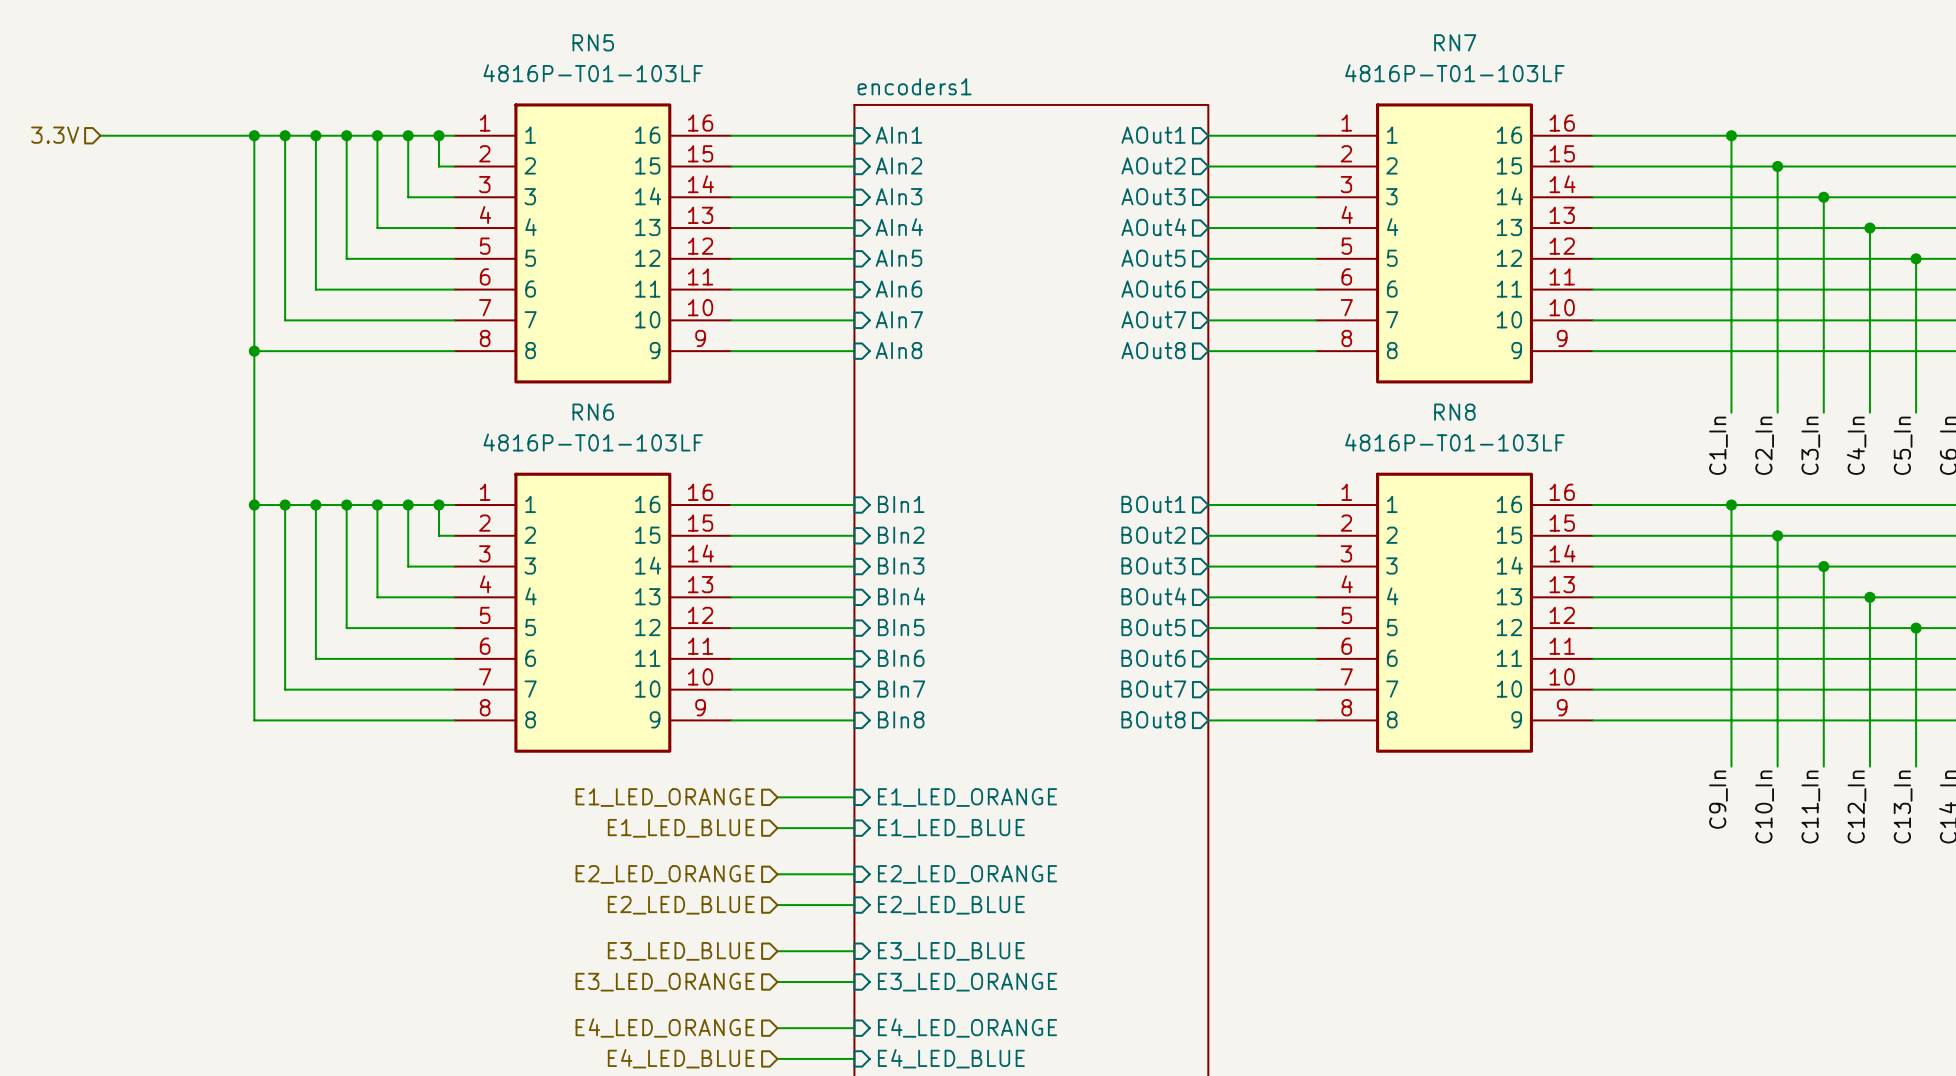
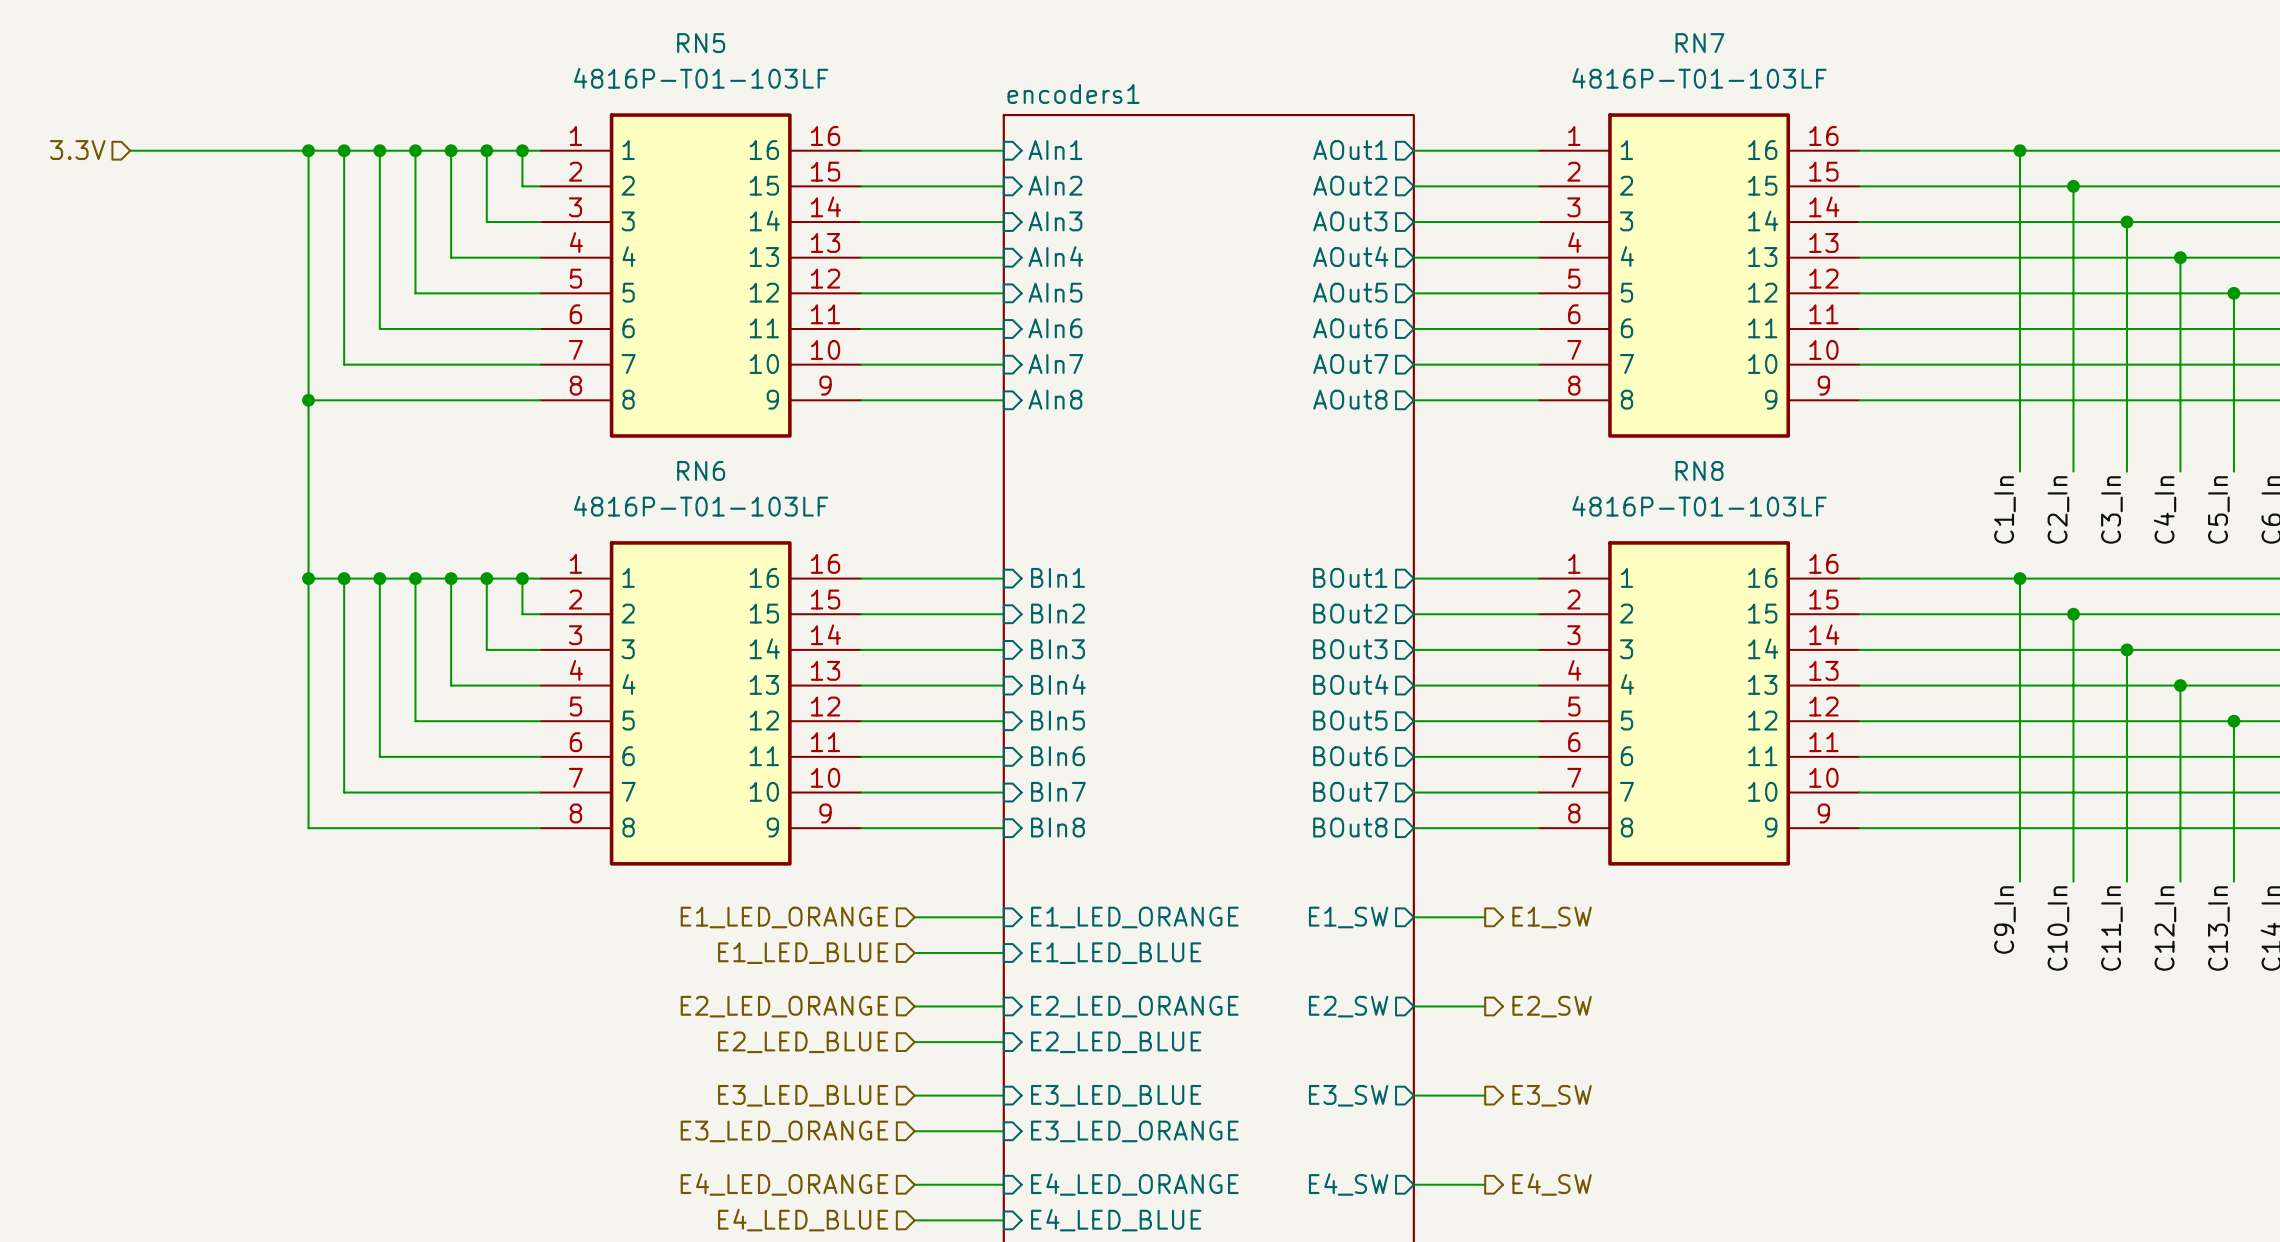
sheet pin: none -> E1_SW (1348, 917)
wire: none -> (1413, 917) (1485, 917)
hierarchical label: none -> E1_SW (1552, 917)
sheet pin: none -> E2_SW (1348, 1006)
wire: none -> (1413, 1006) (1485, 1006)
hierarchical label: none -> E2_SW (1552, 1006)
sheet pin: none -> E3_SW (1348, 1095)
wire: none -> (1413, 1095) (1485, 1095)
hierarchical label: none -> E3_SW (1552, 1095)
sheet pin: none -> E4_SW (1348, 1184)
hierarchical label: none -> E4_SW (1552, 1184)
wire: none -> (1413, 1184) (1485, 1184)

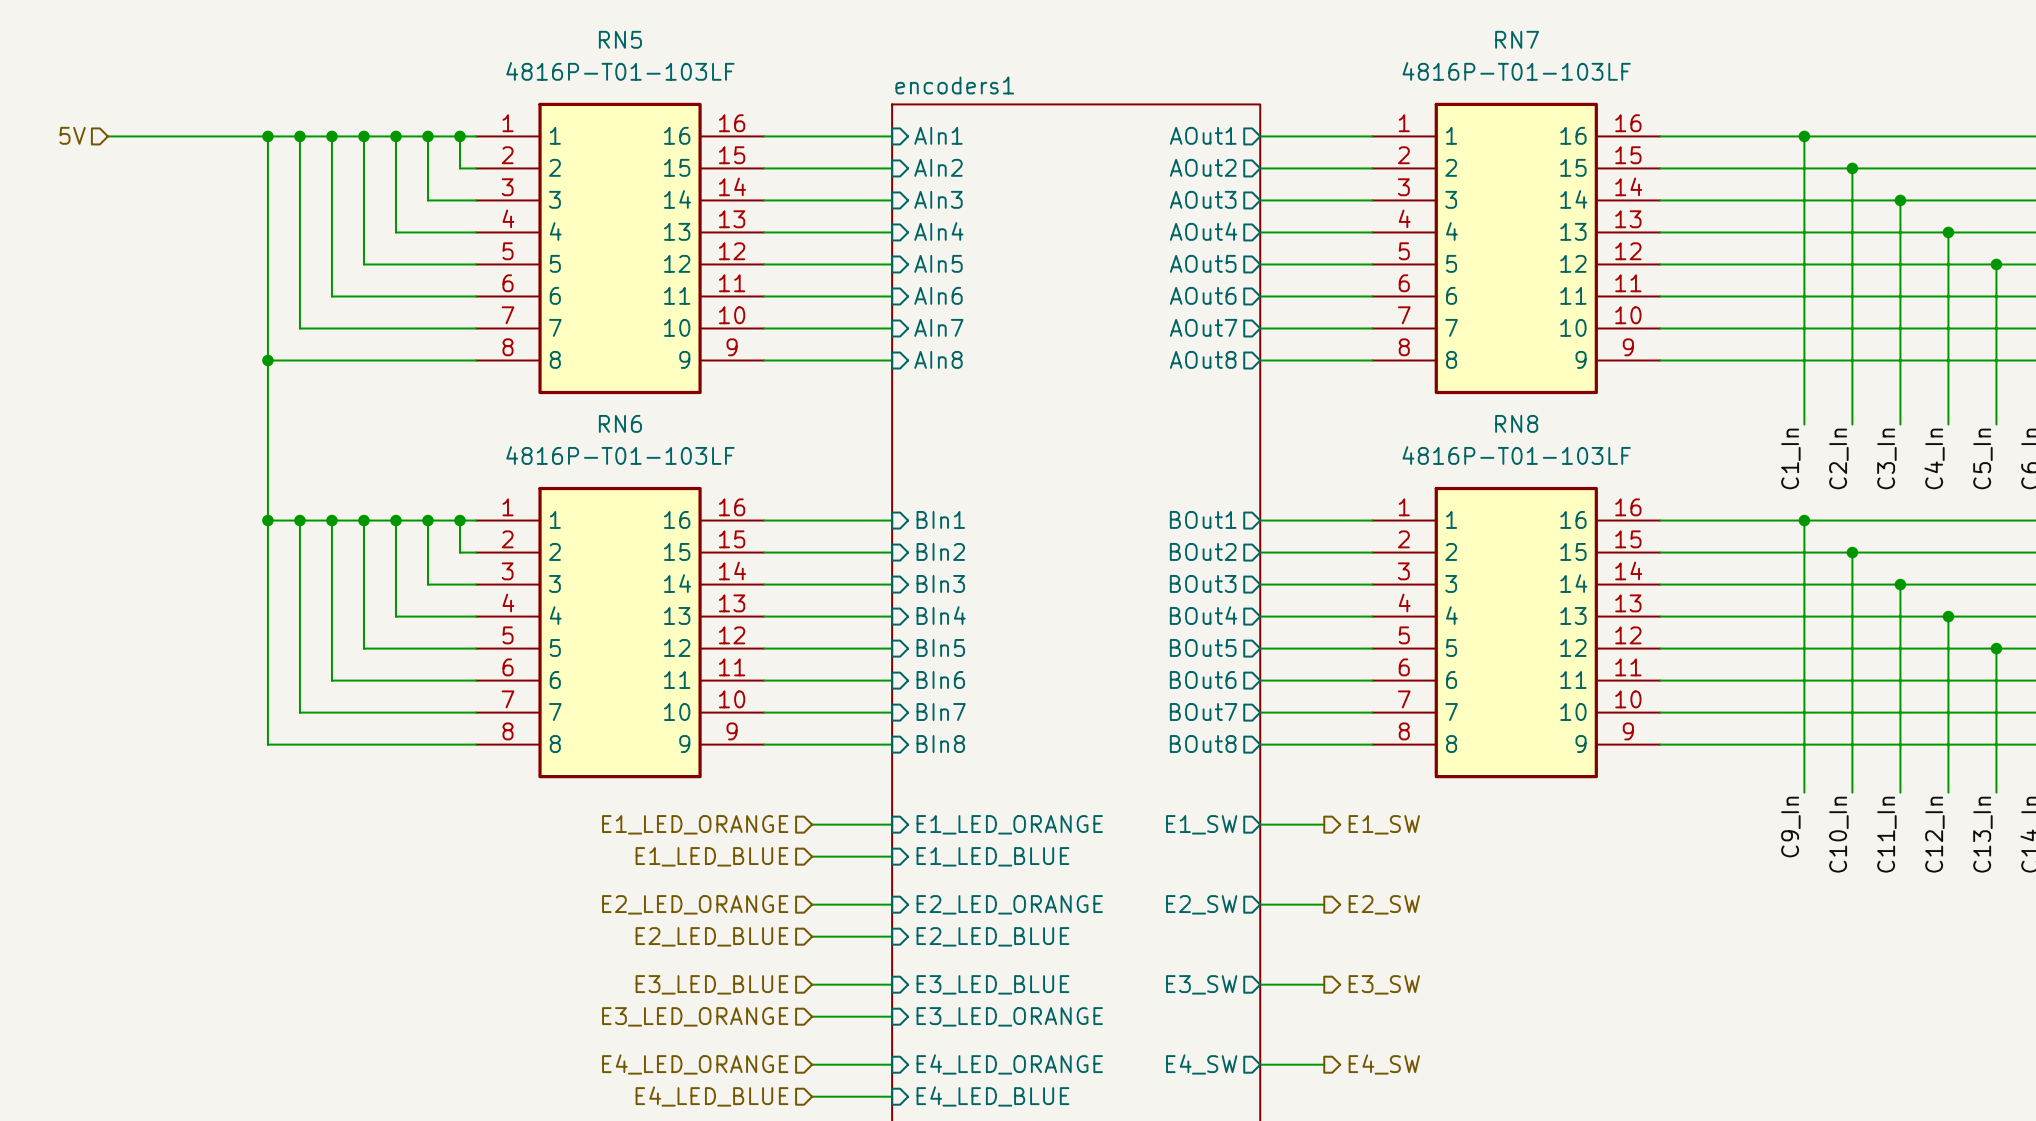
hierarchical label: 3.3V (77, 150) -> 5V (72, 135)

